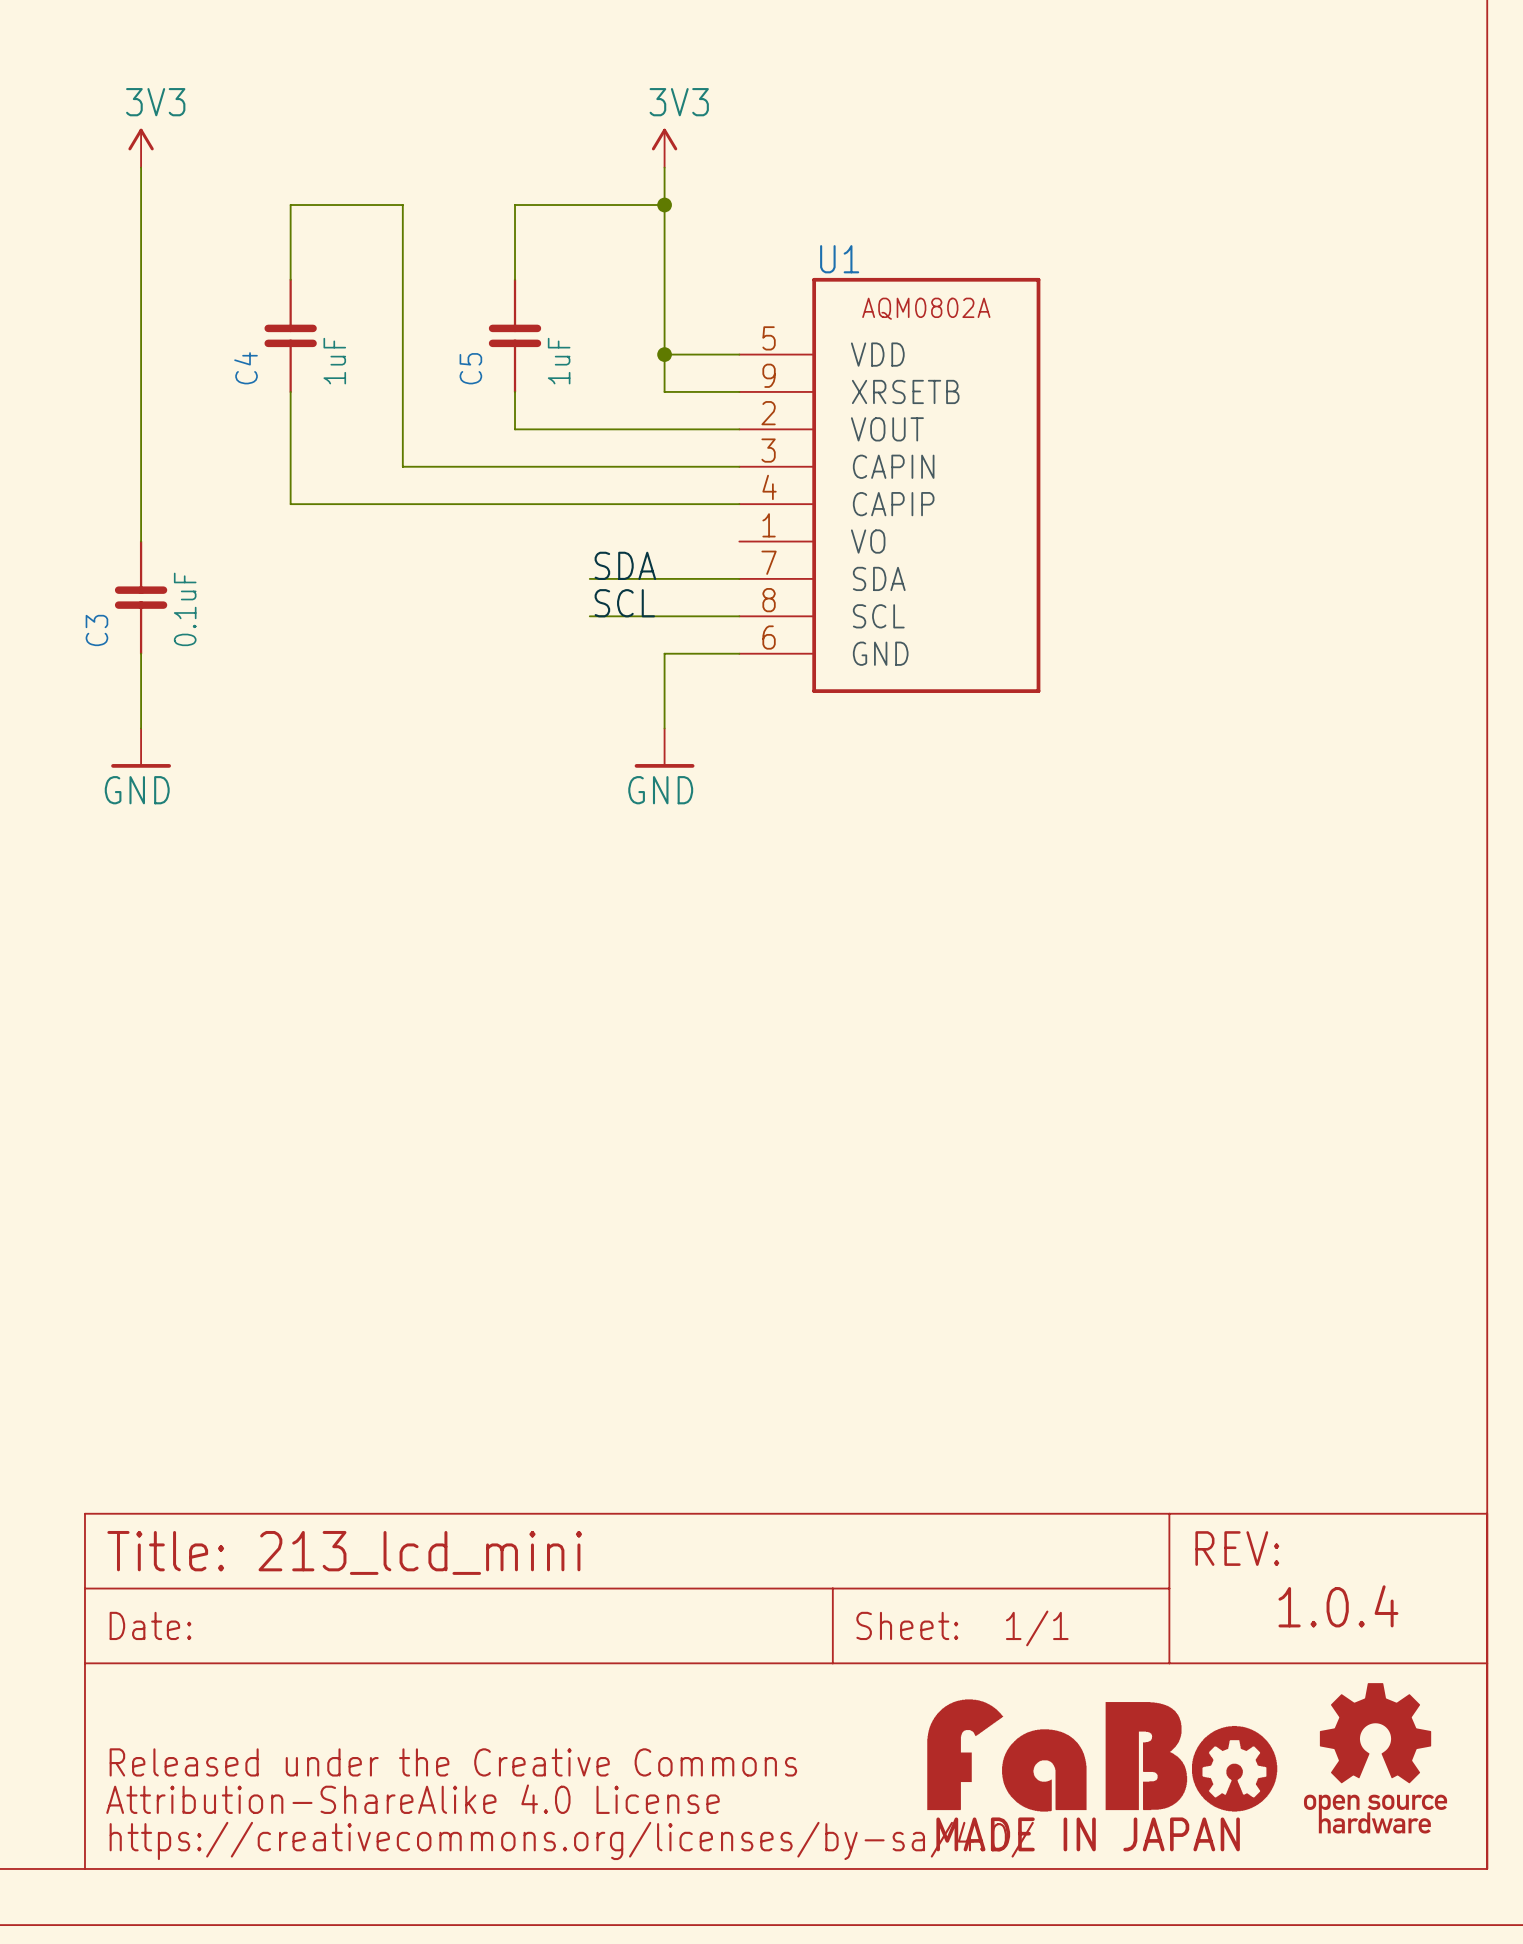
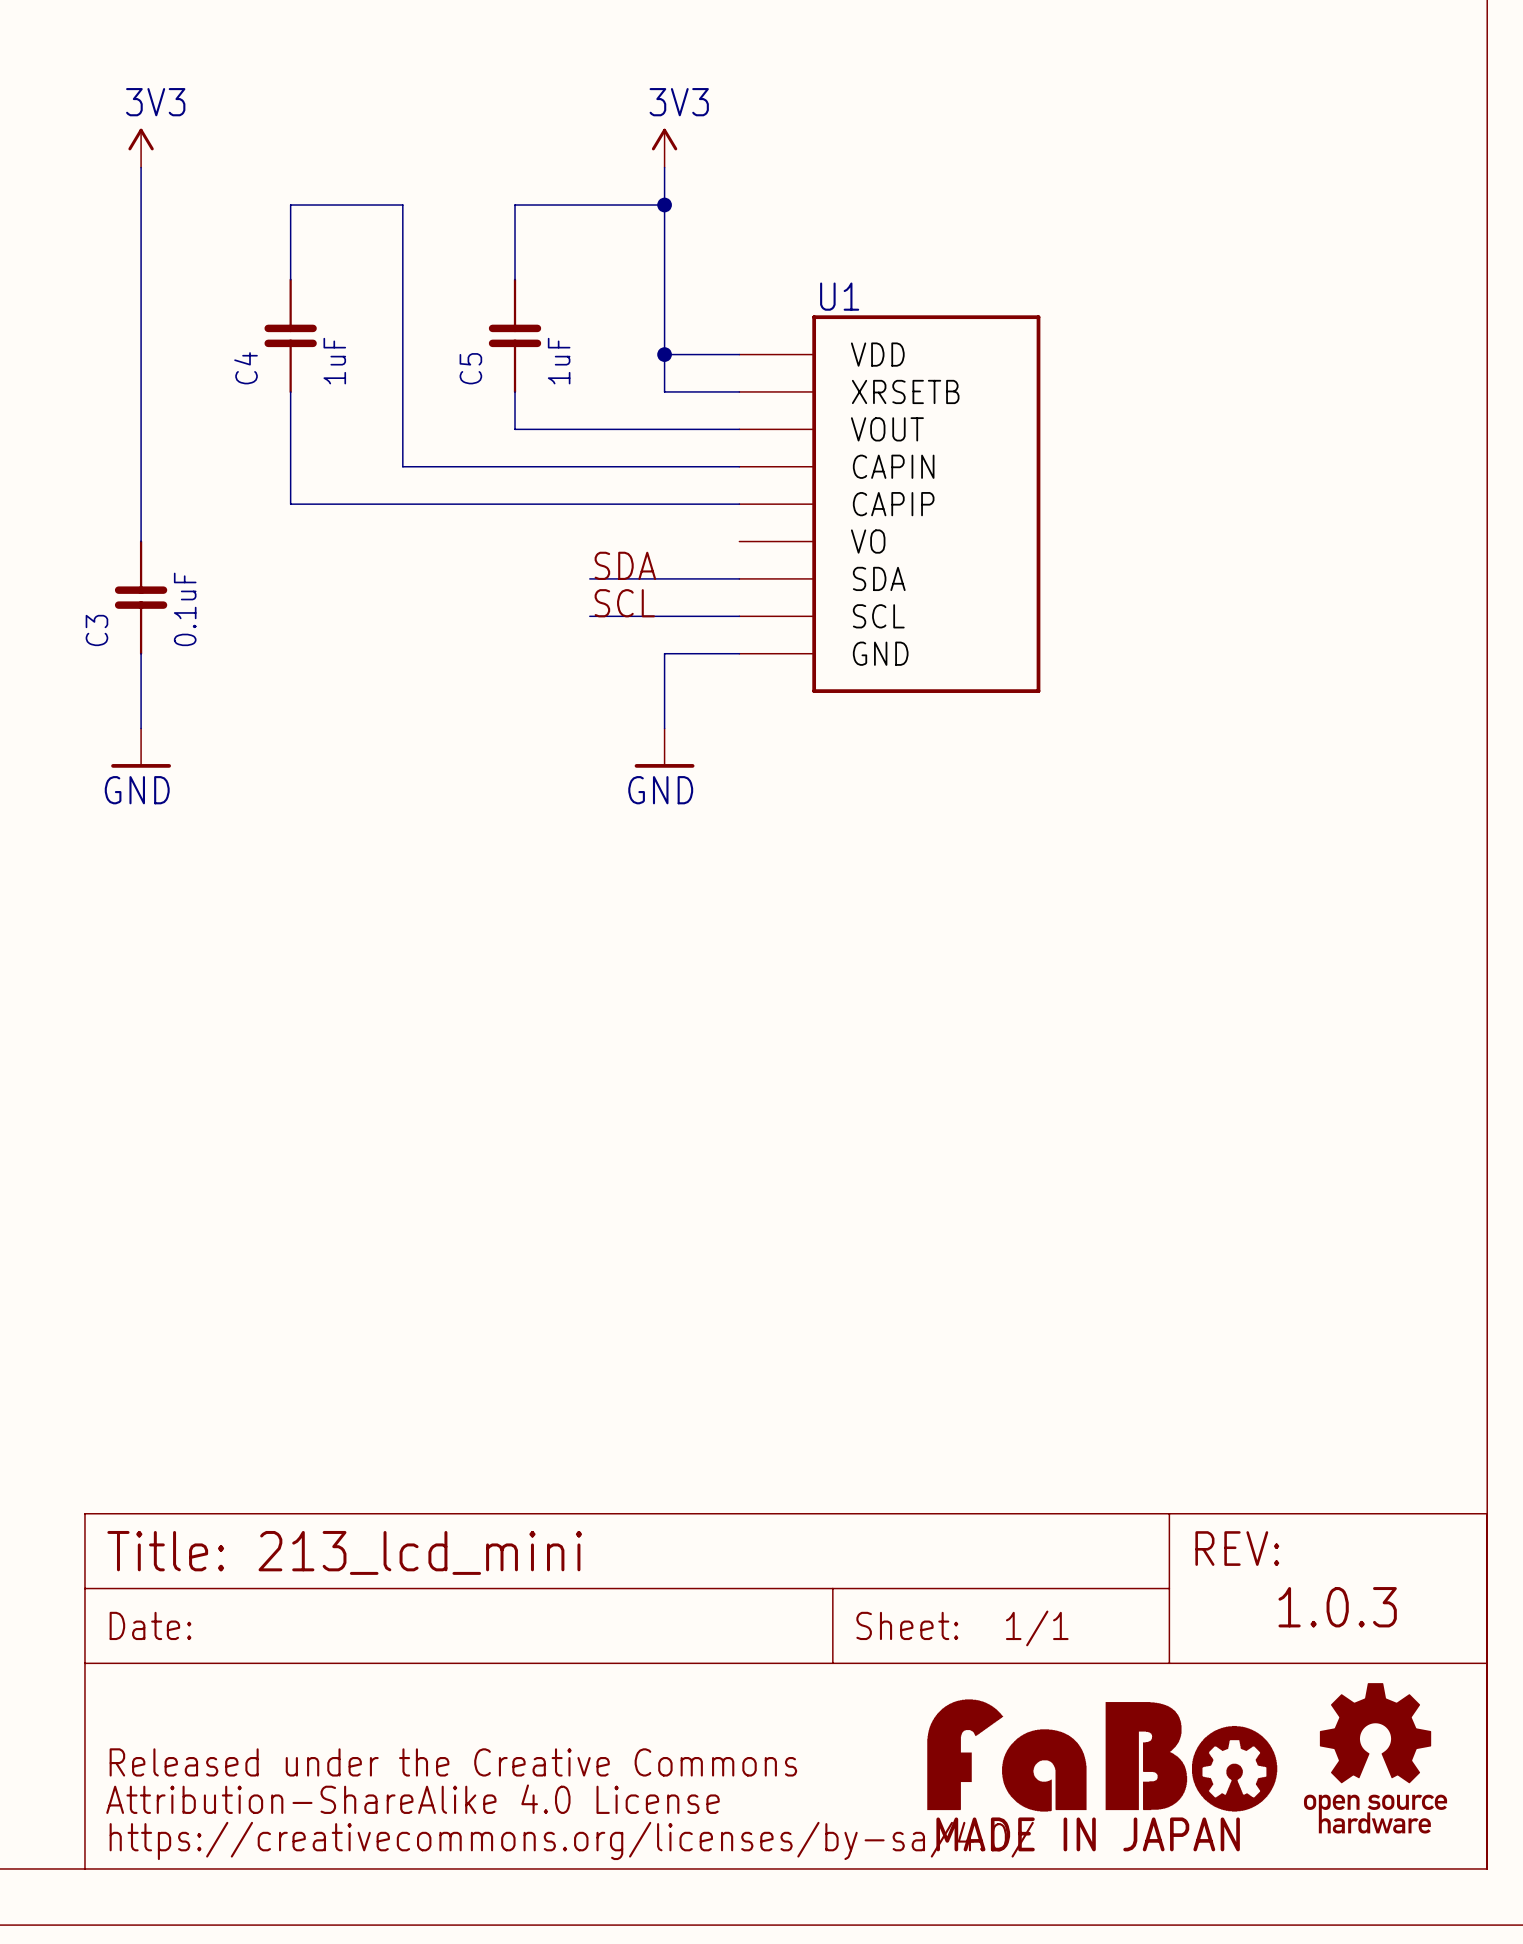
U1 symbol: [739, 277, 1041, 693] -> [739, 315, 1041, 693]
text: 1.0.4 (1338, 1606) -> 1.0.3 (1337, 1607)

